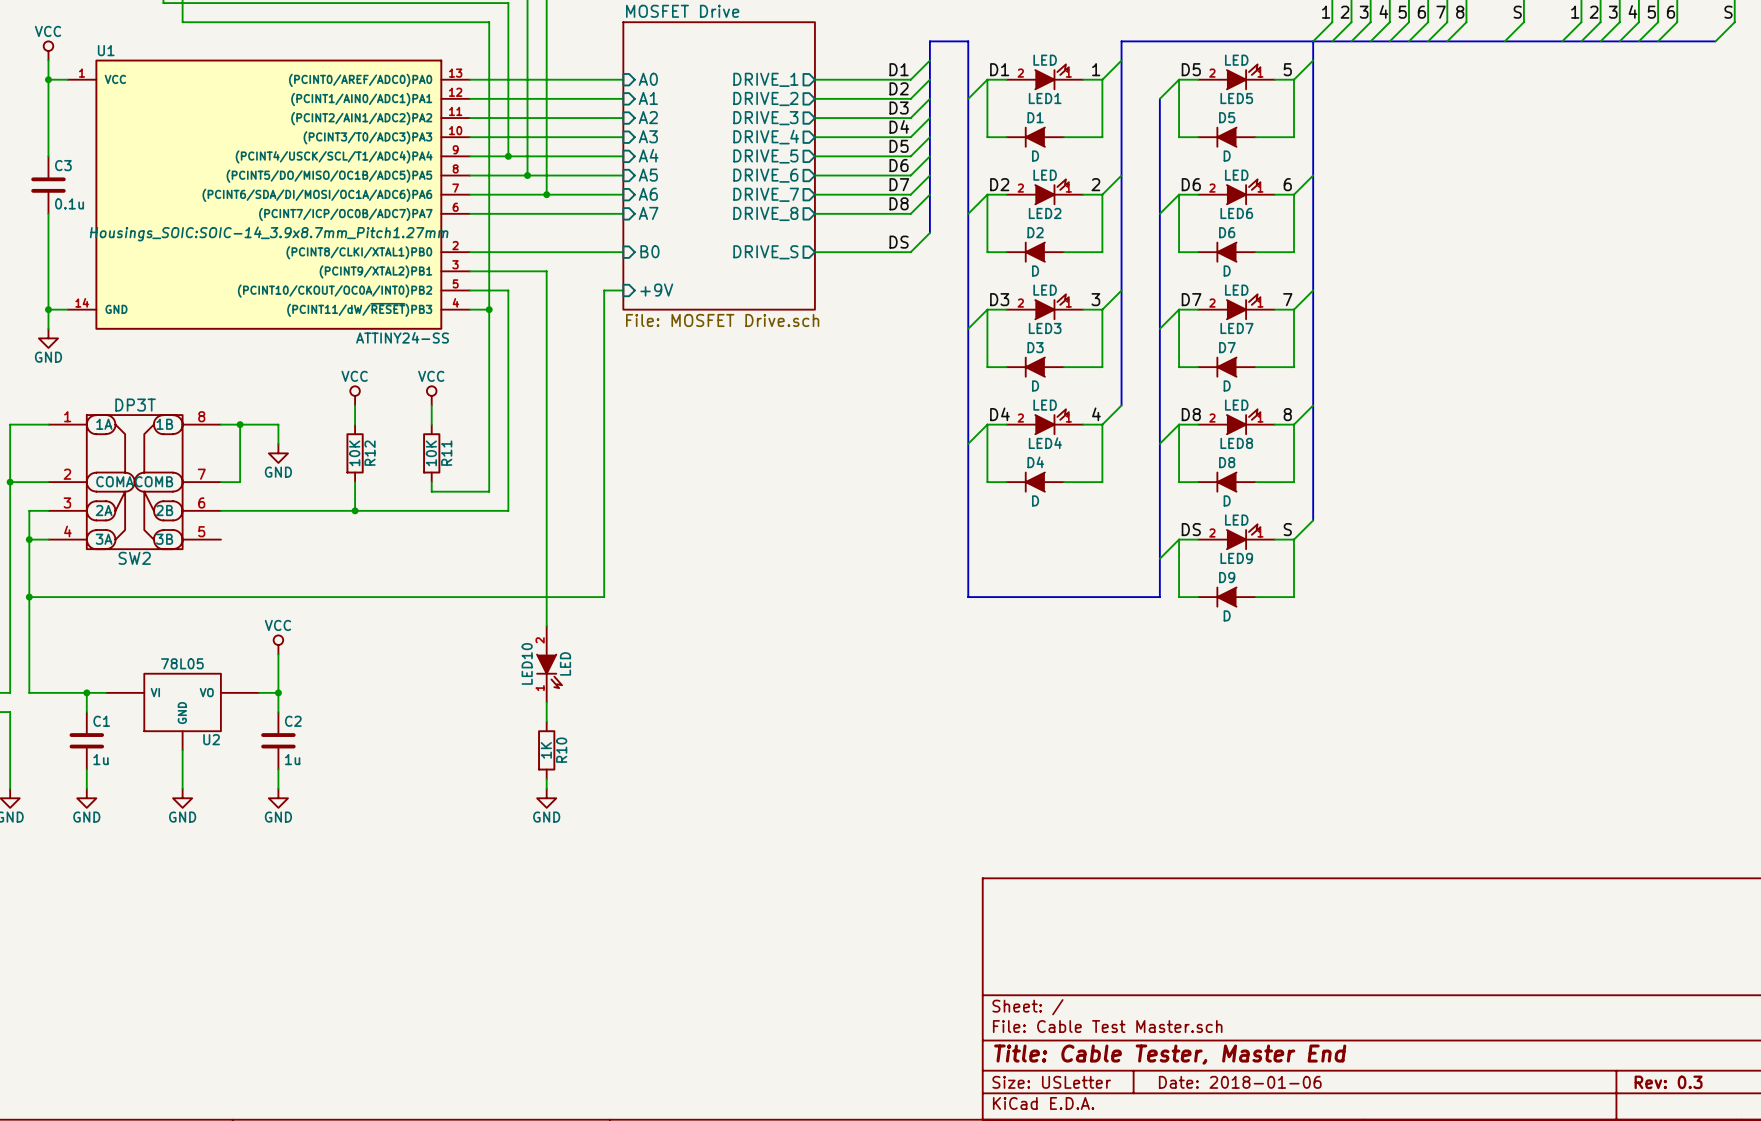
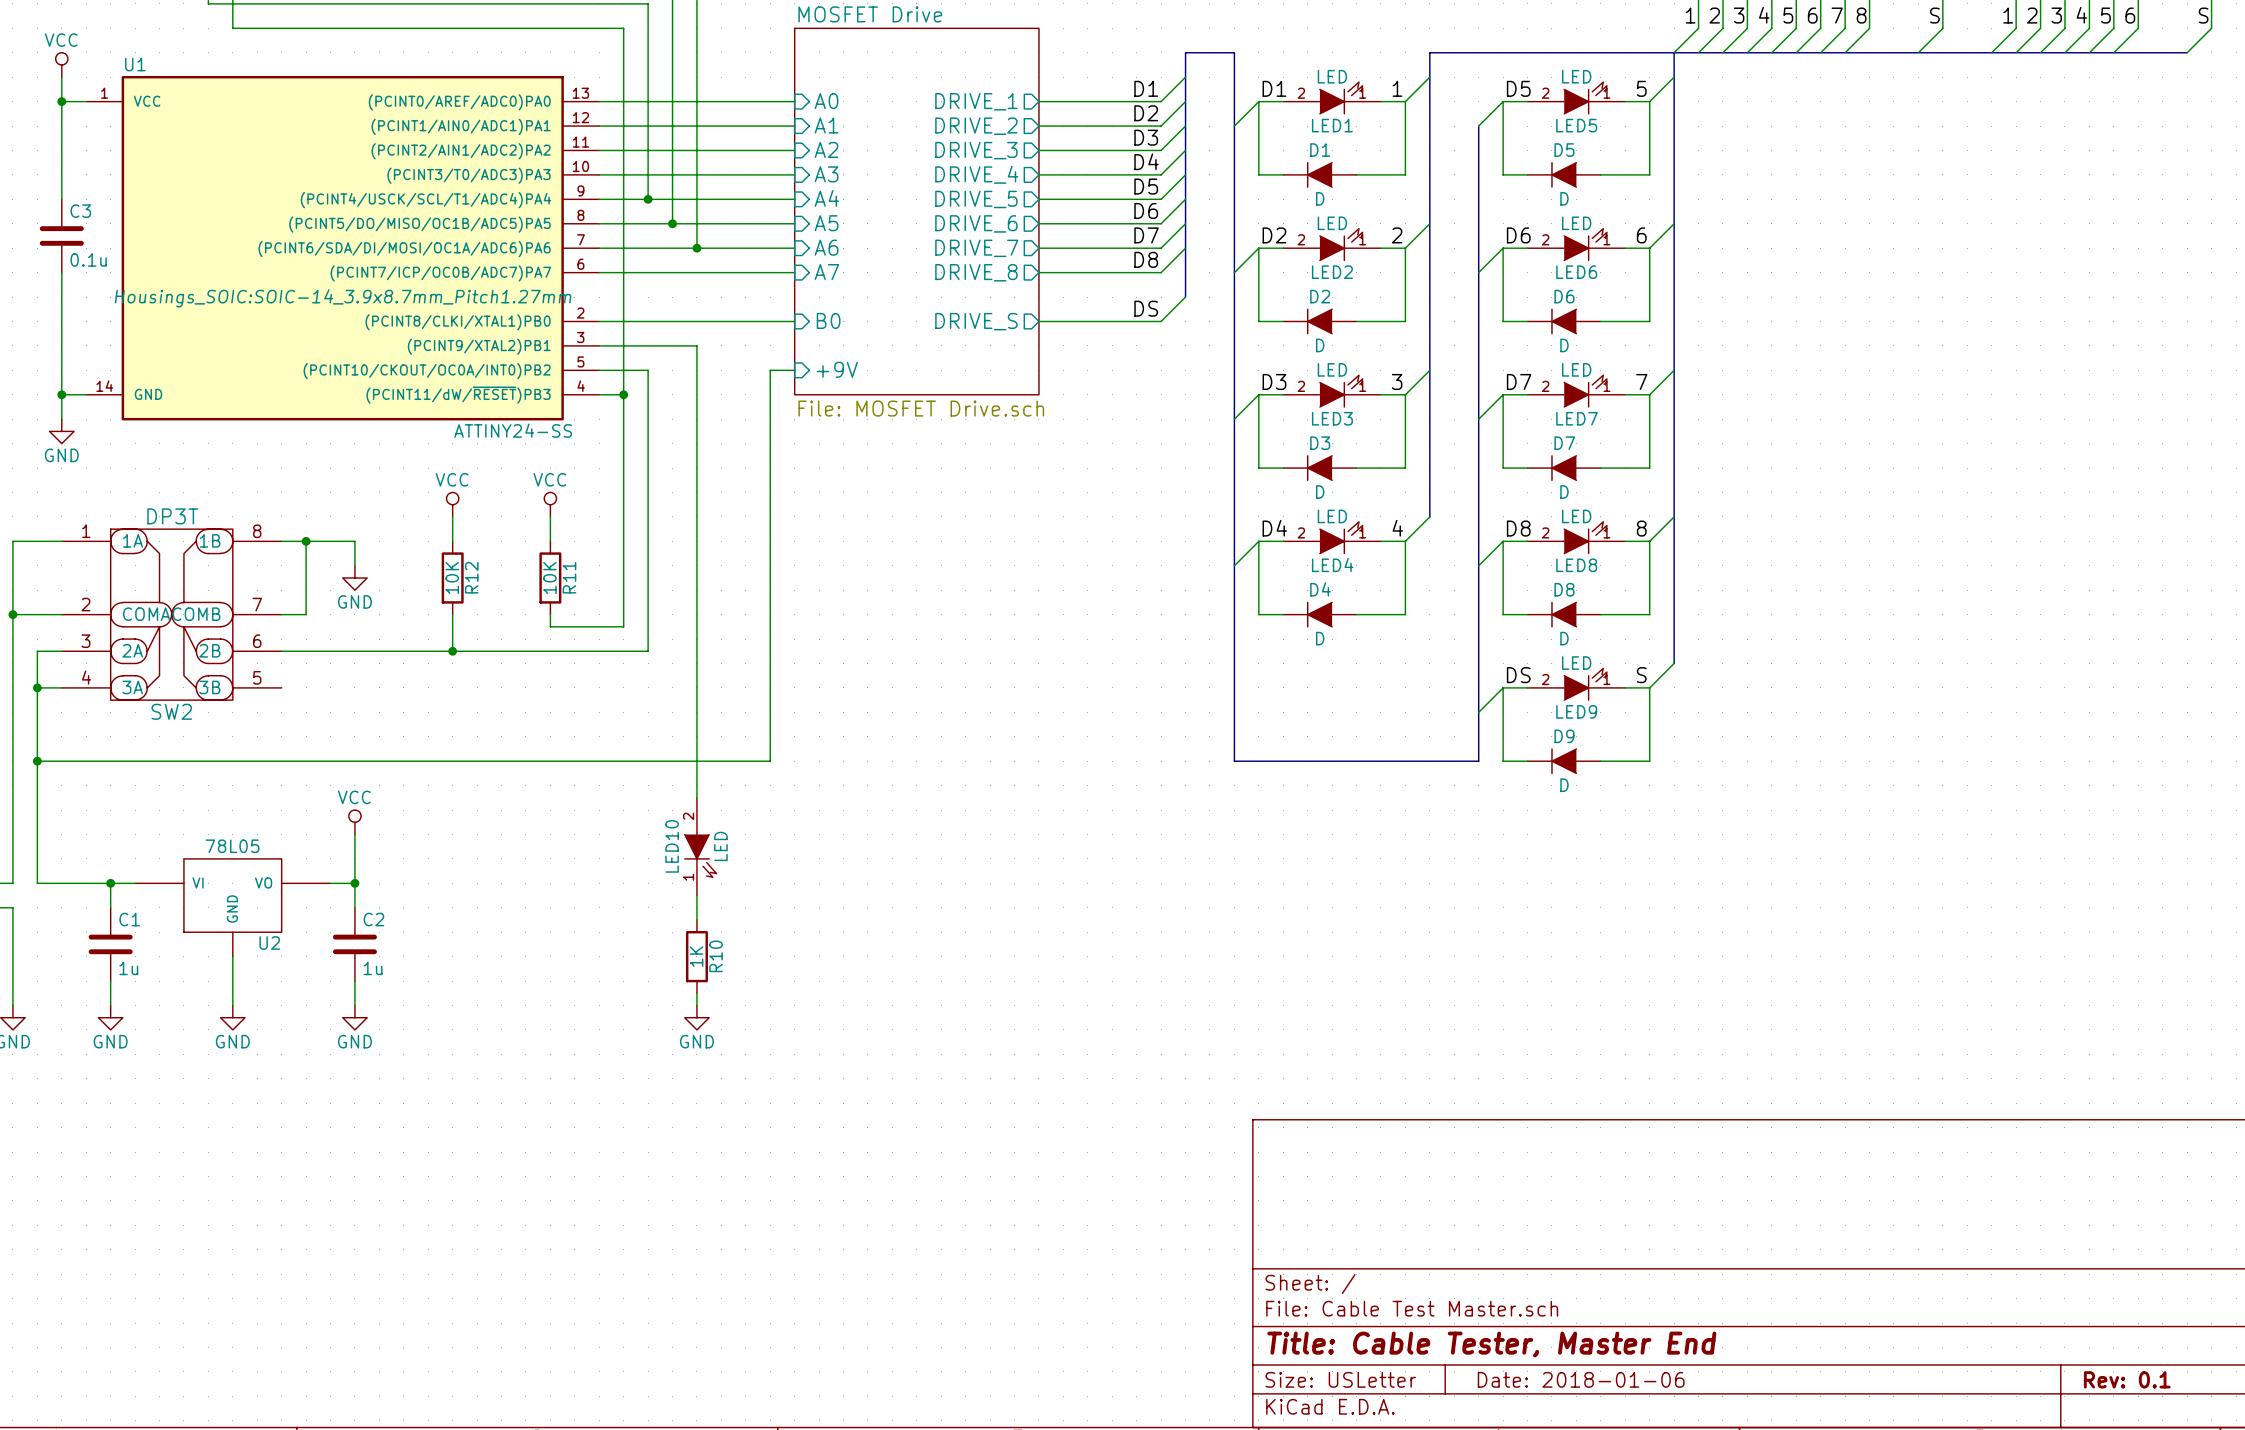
title block: Rev: 0.3 (1668, 1082) -> Rev: 0.1 (2127, 1379)

